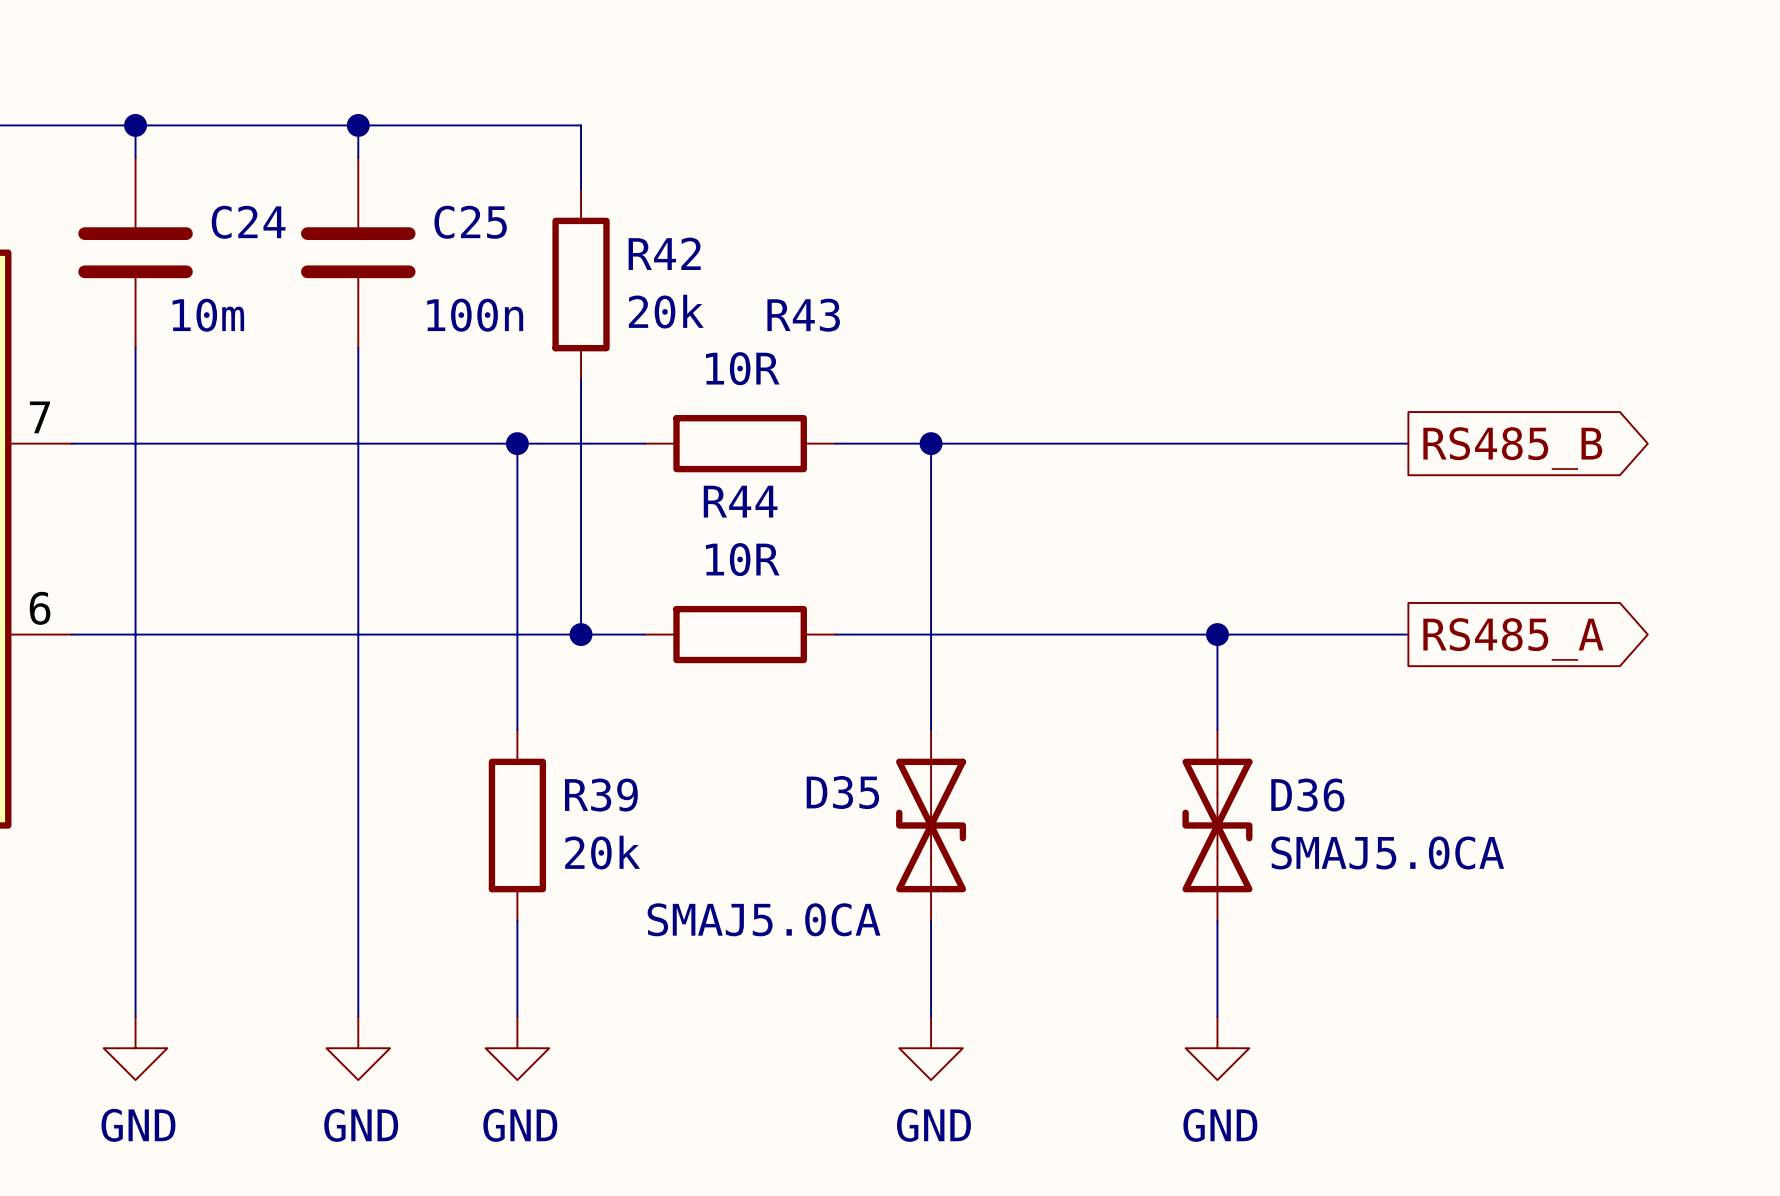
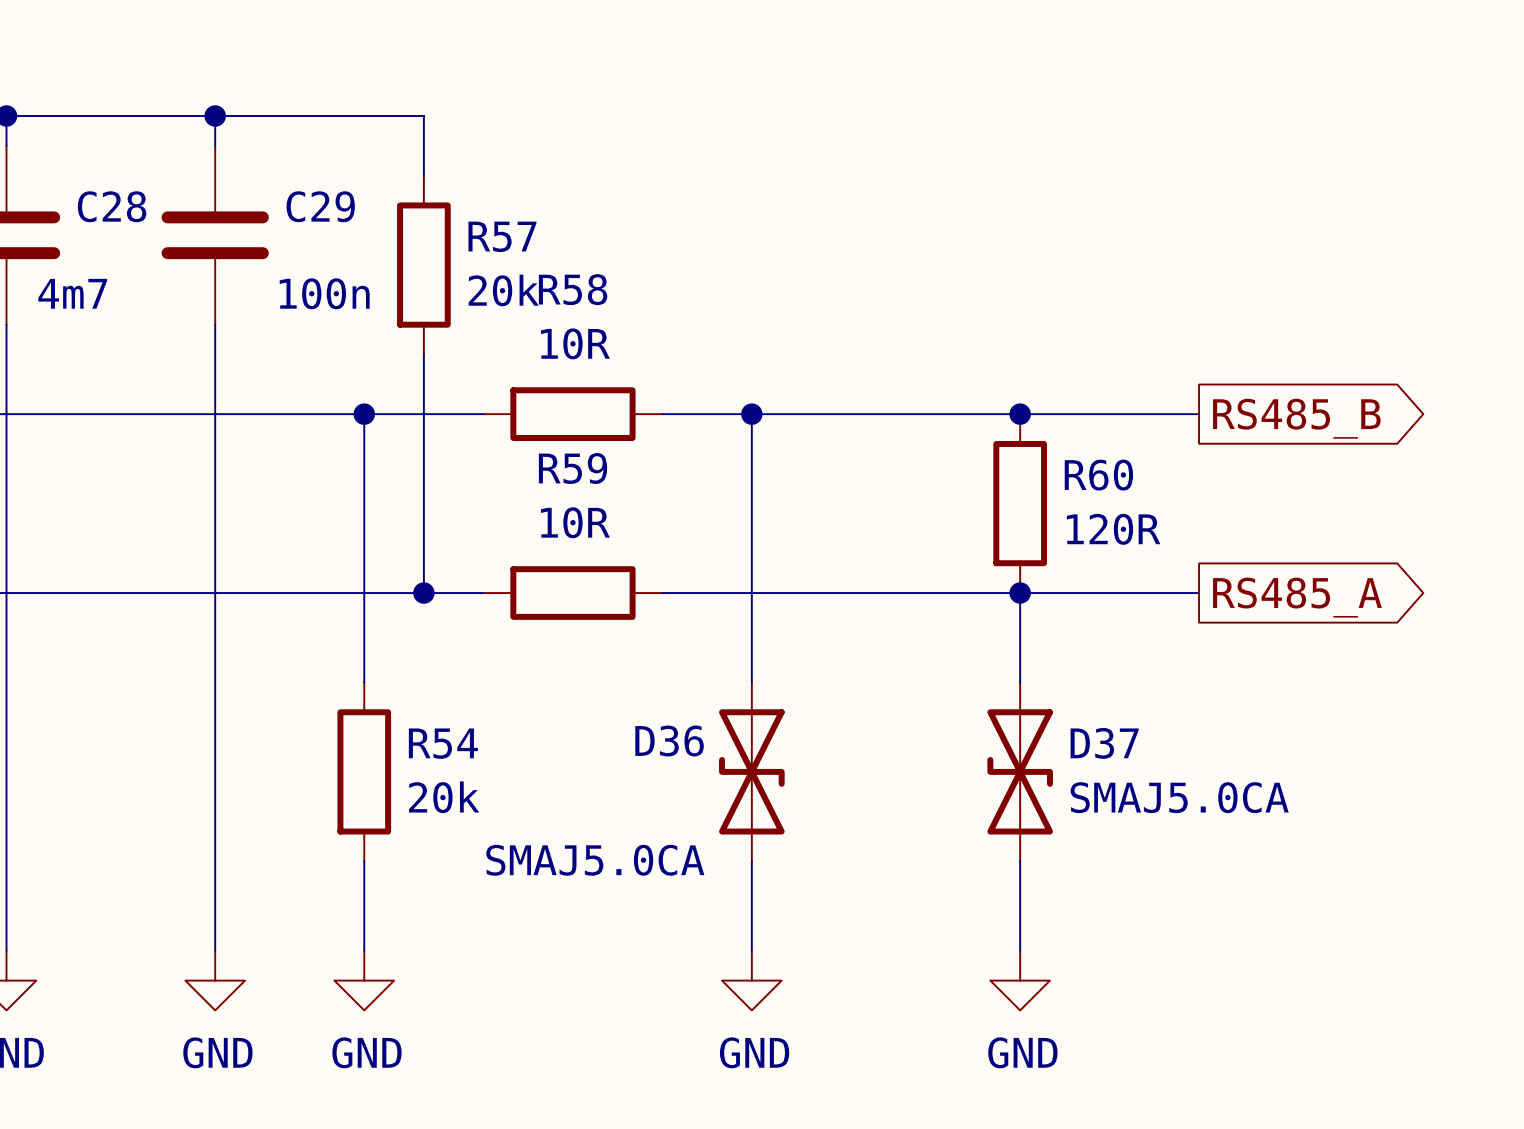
C24 name: C24 (248, 222) -> C28 (112, 206)
C25 name: C25 (470, 222) -> C29 (320, 206)
R42 name: R42 (664, 253) -> R57 (502, 236)
C24 value: 10m (208, 315) -> 4m7 (72, 293)
R43 name: R43 (803, 315) -> R58 (573, 289)
junction: none -> (1020, 414)
R44 name: R44 (740, 501) -> R59 (573, 468)
R60: none -> 120R (1020, 503)
D35 name: D35 (842, 792) -> D36 (669, 741)
R39 name: R39 (601, 795) -> R54 (443, 743)
D36 name: D36 (1307, 795) -> D37 (1104, 743)

